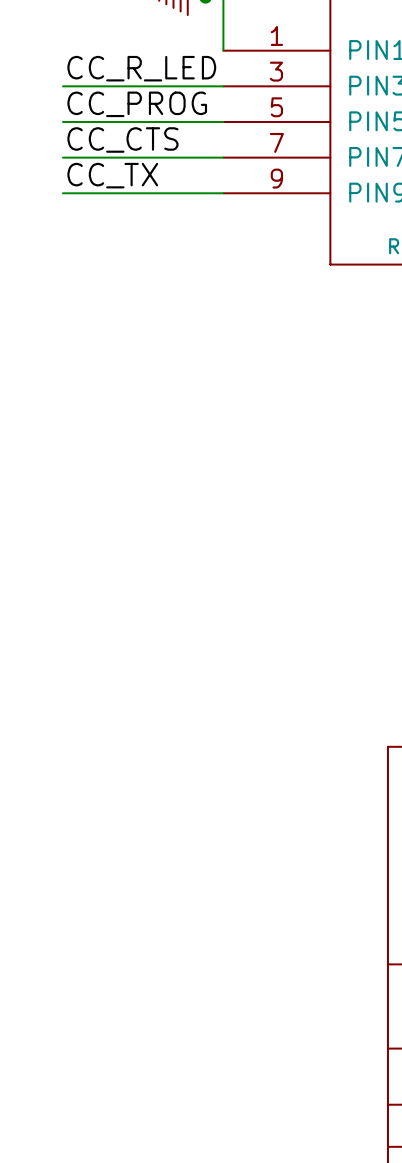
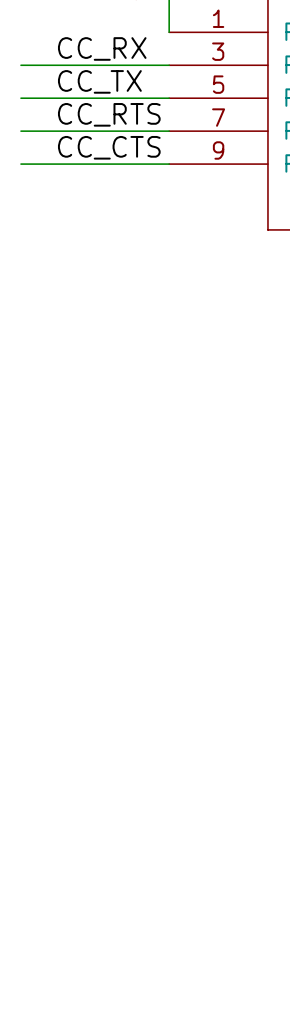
label: CC_R_LED (141, 68) -> none
label: none -> CC_RX (102, 48)
label: CC_PROG (137, 104) -> none
label position: CC_CTS (122, 139) -> CC_CTS (109, 147)
label: none -> CC_RTS (109, 114)
label position: CC_TX (112, 175) -> CC_TX (99, 81)

